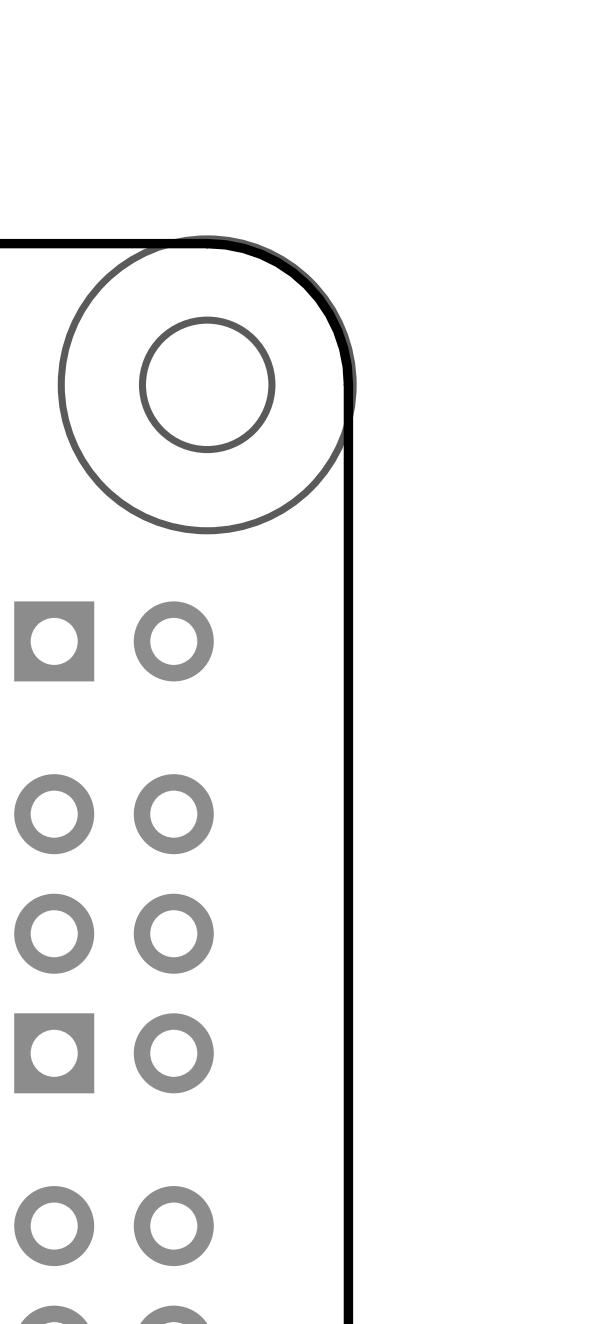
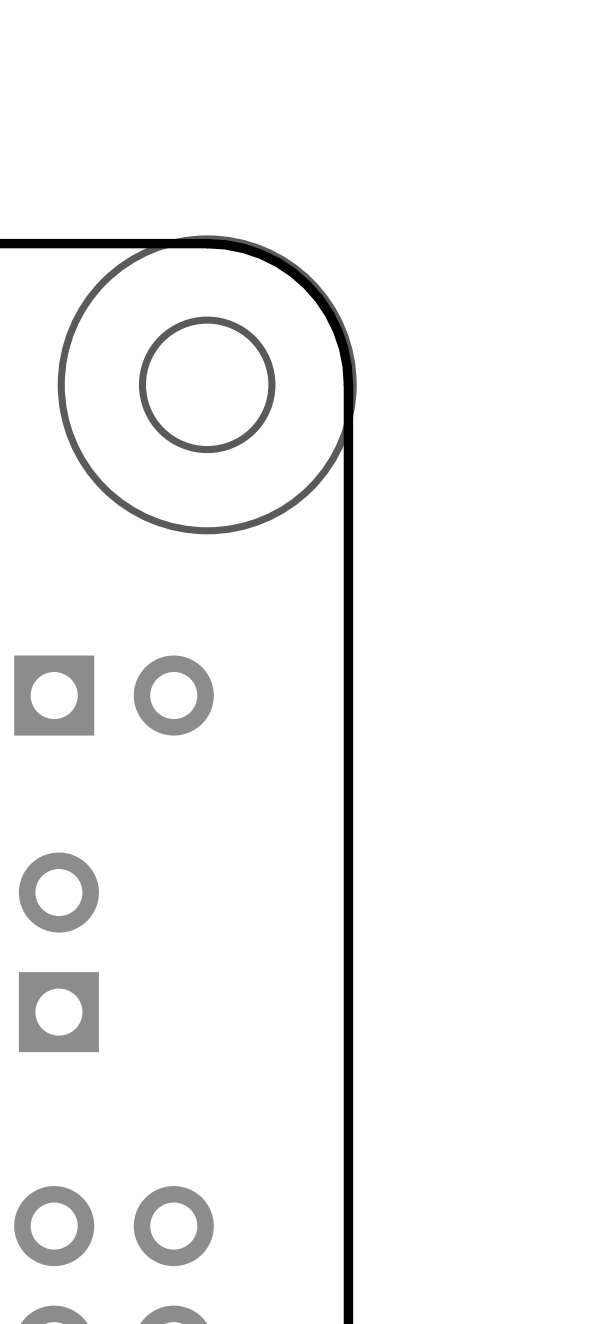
part position: (113, 641) -> (113, 695)
part: (113, 933) -> none
part: none -> (58, 952)

